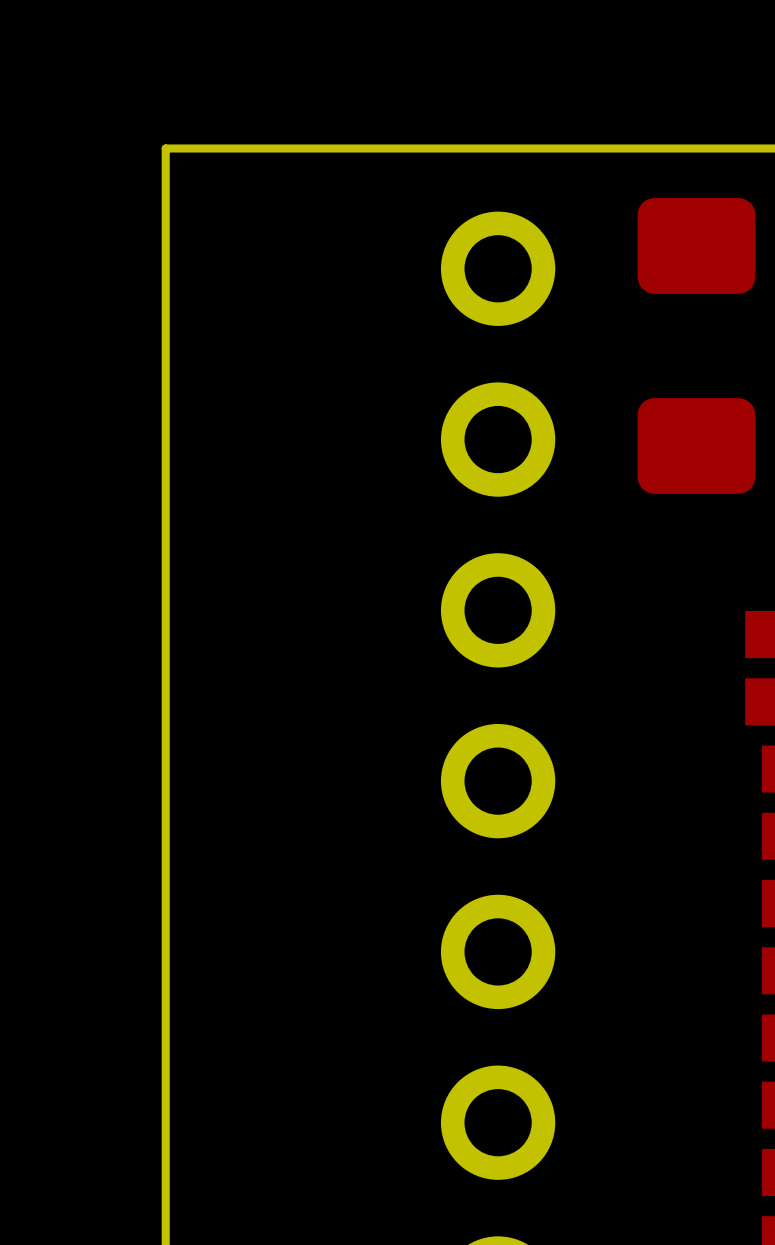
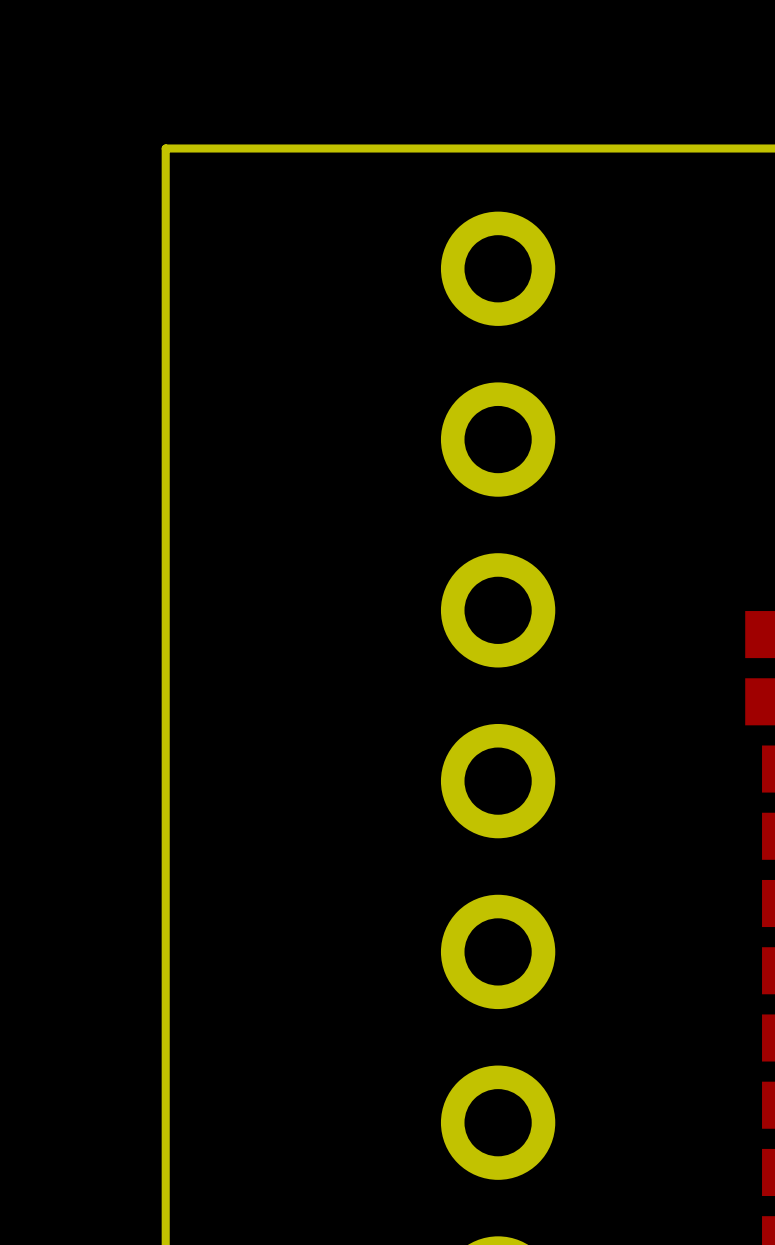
part: (696, 345) -> none

